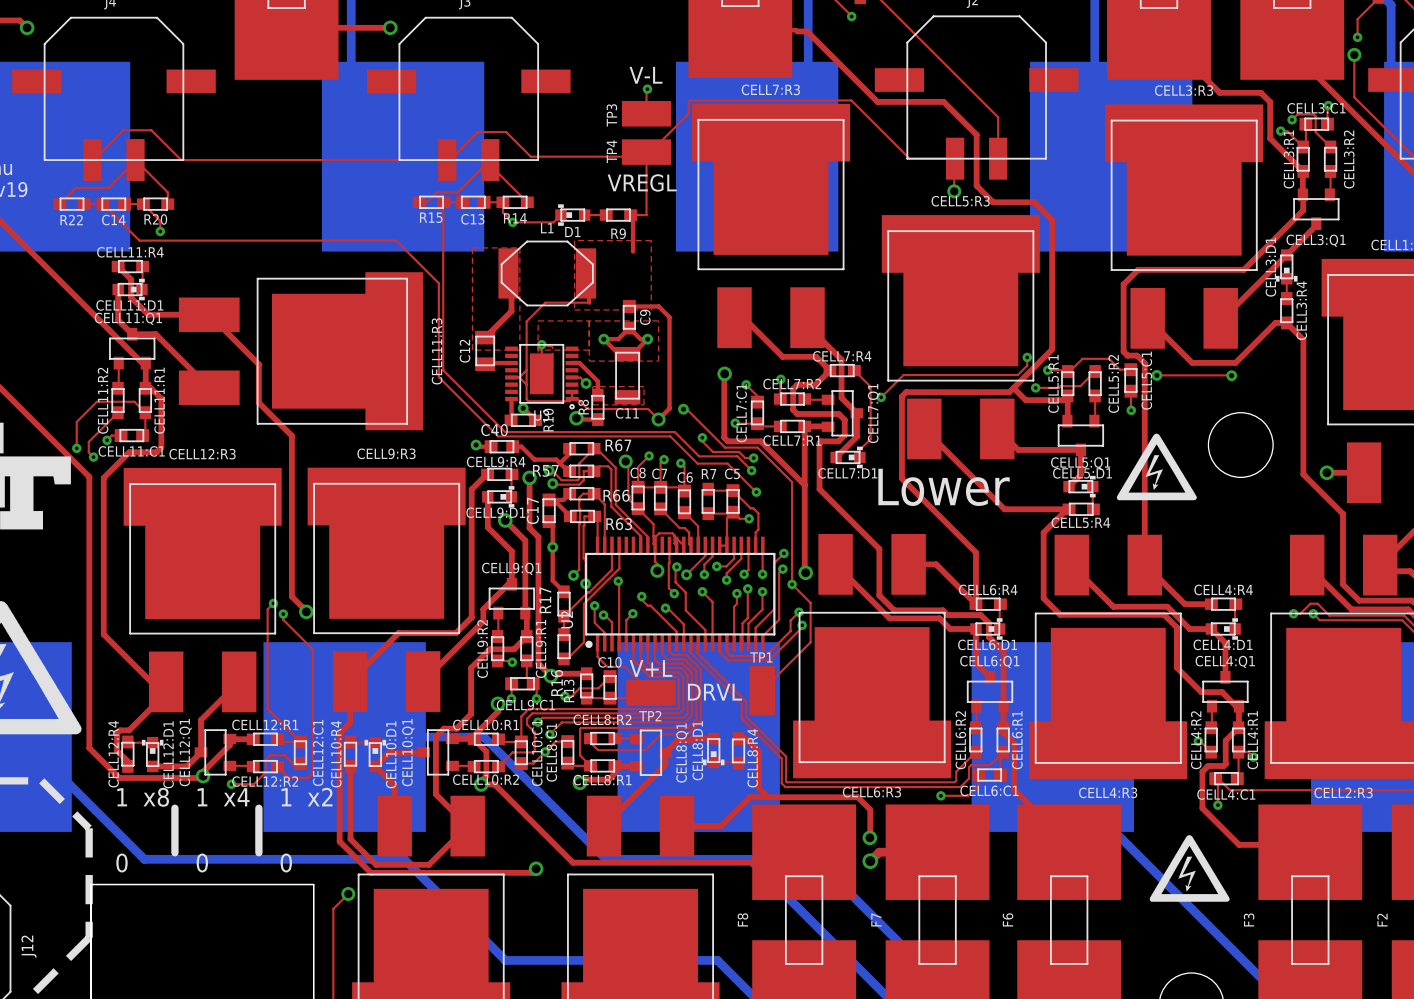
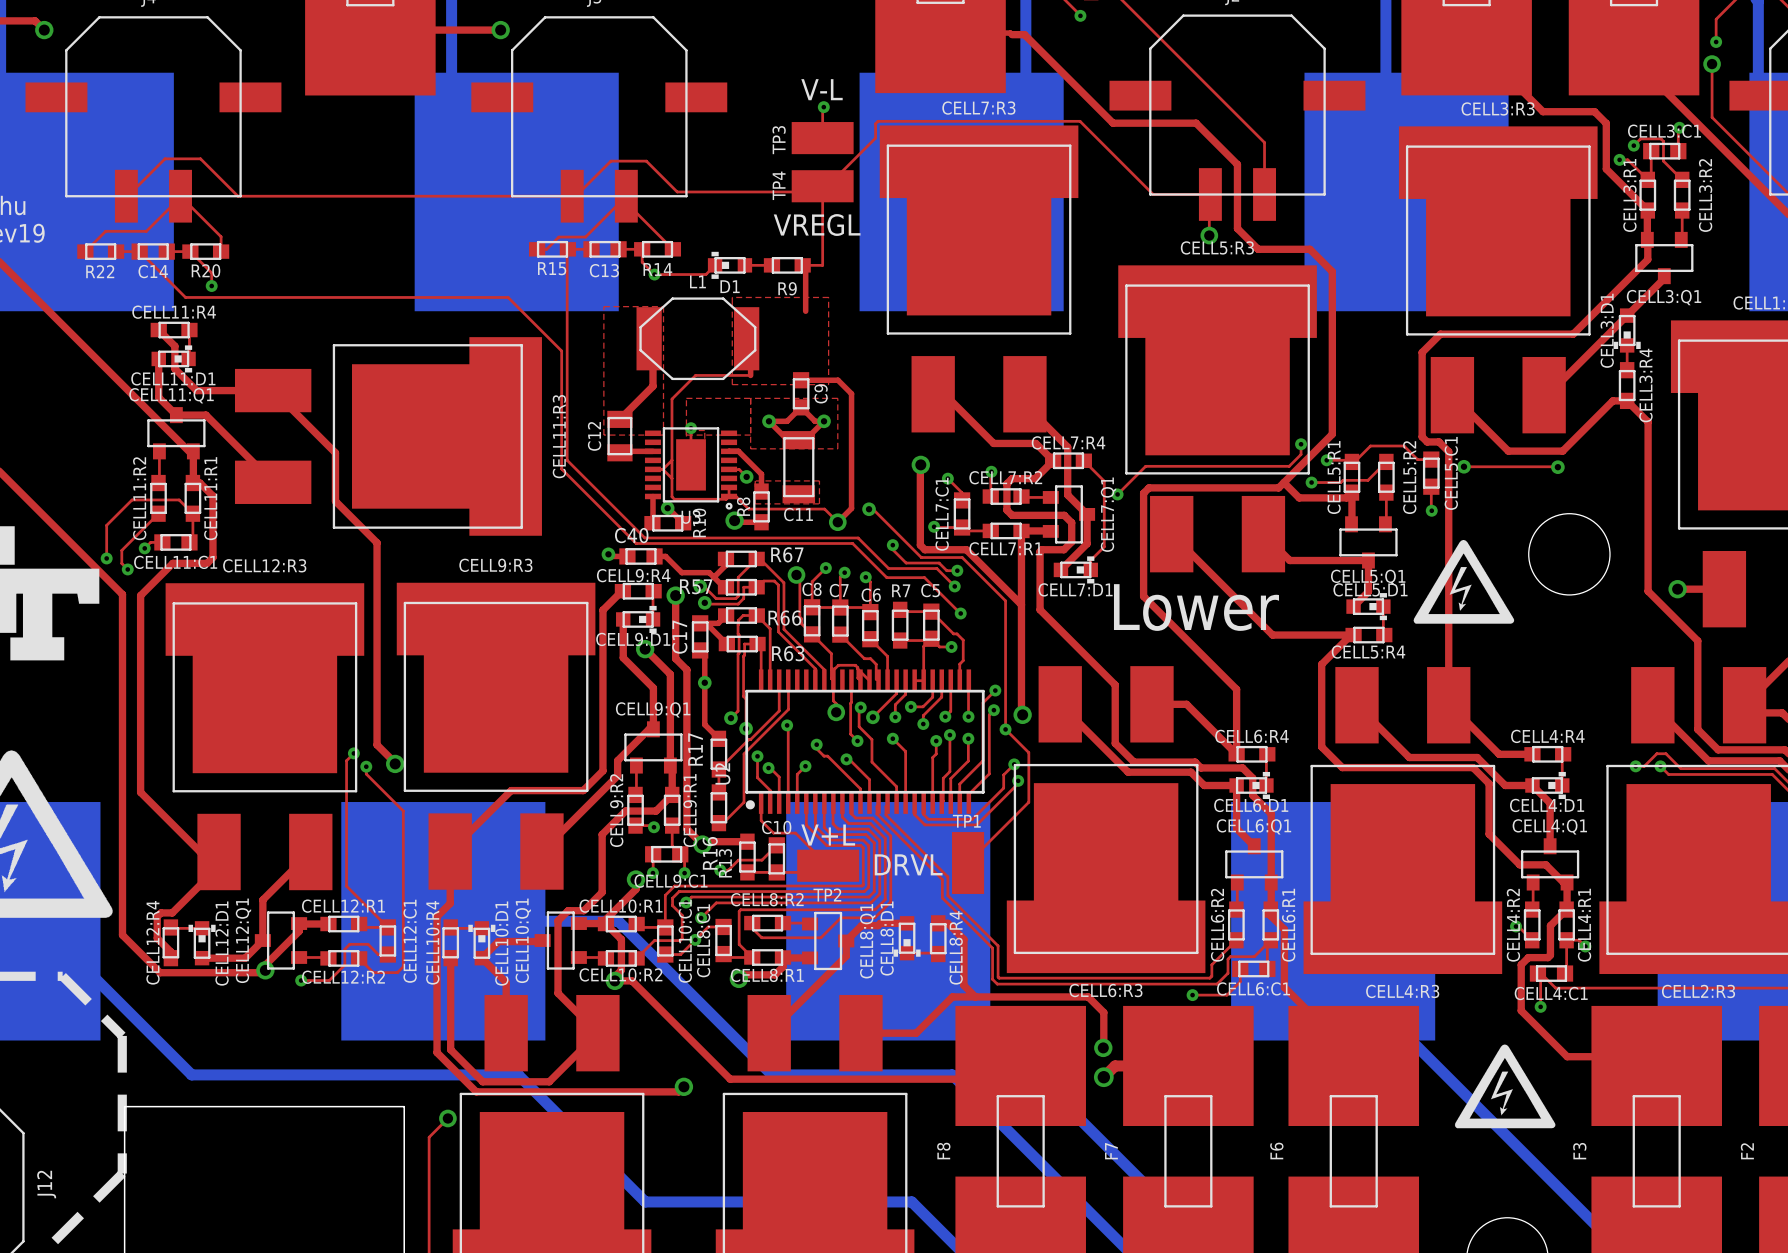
text: 1 (122, 797) -> none
text: x8 (156, 797) -> none
text: 1 (202, 797) -> none
text: x4 (236, 797) -> none
text: 1 (286, 797) -> none
text: x2 (320, 797) -> none
line: (174, 808) (174, 852) -> none
line: (258, 808) (258, 852) -> none
text: 0 (122, 862) -> none
text: 0 (202, 862) -> none
text: 0 (286, 862) -> none

